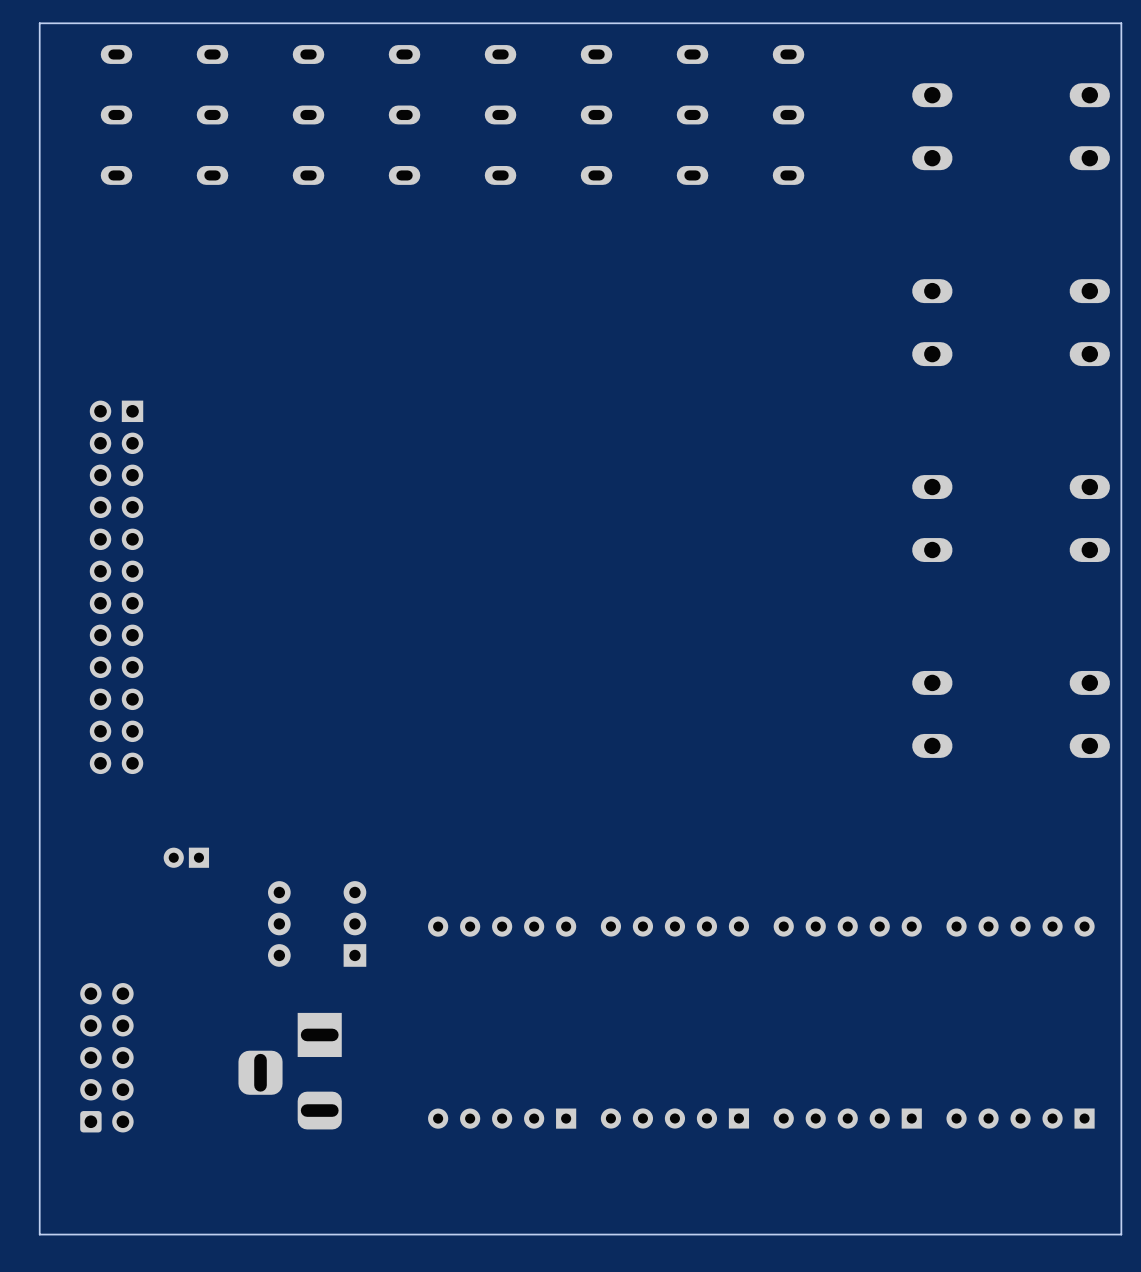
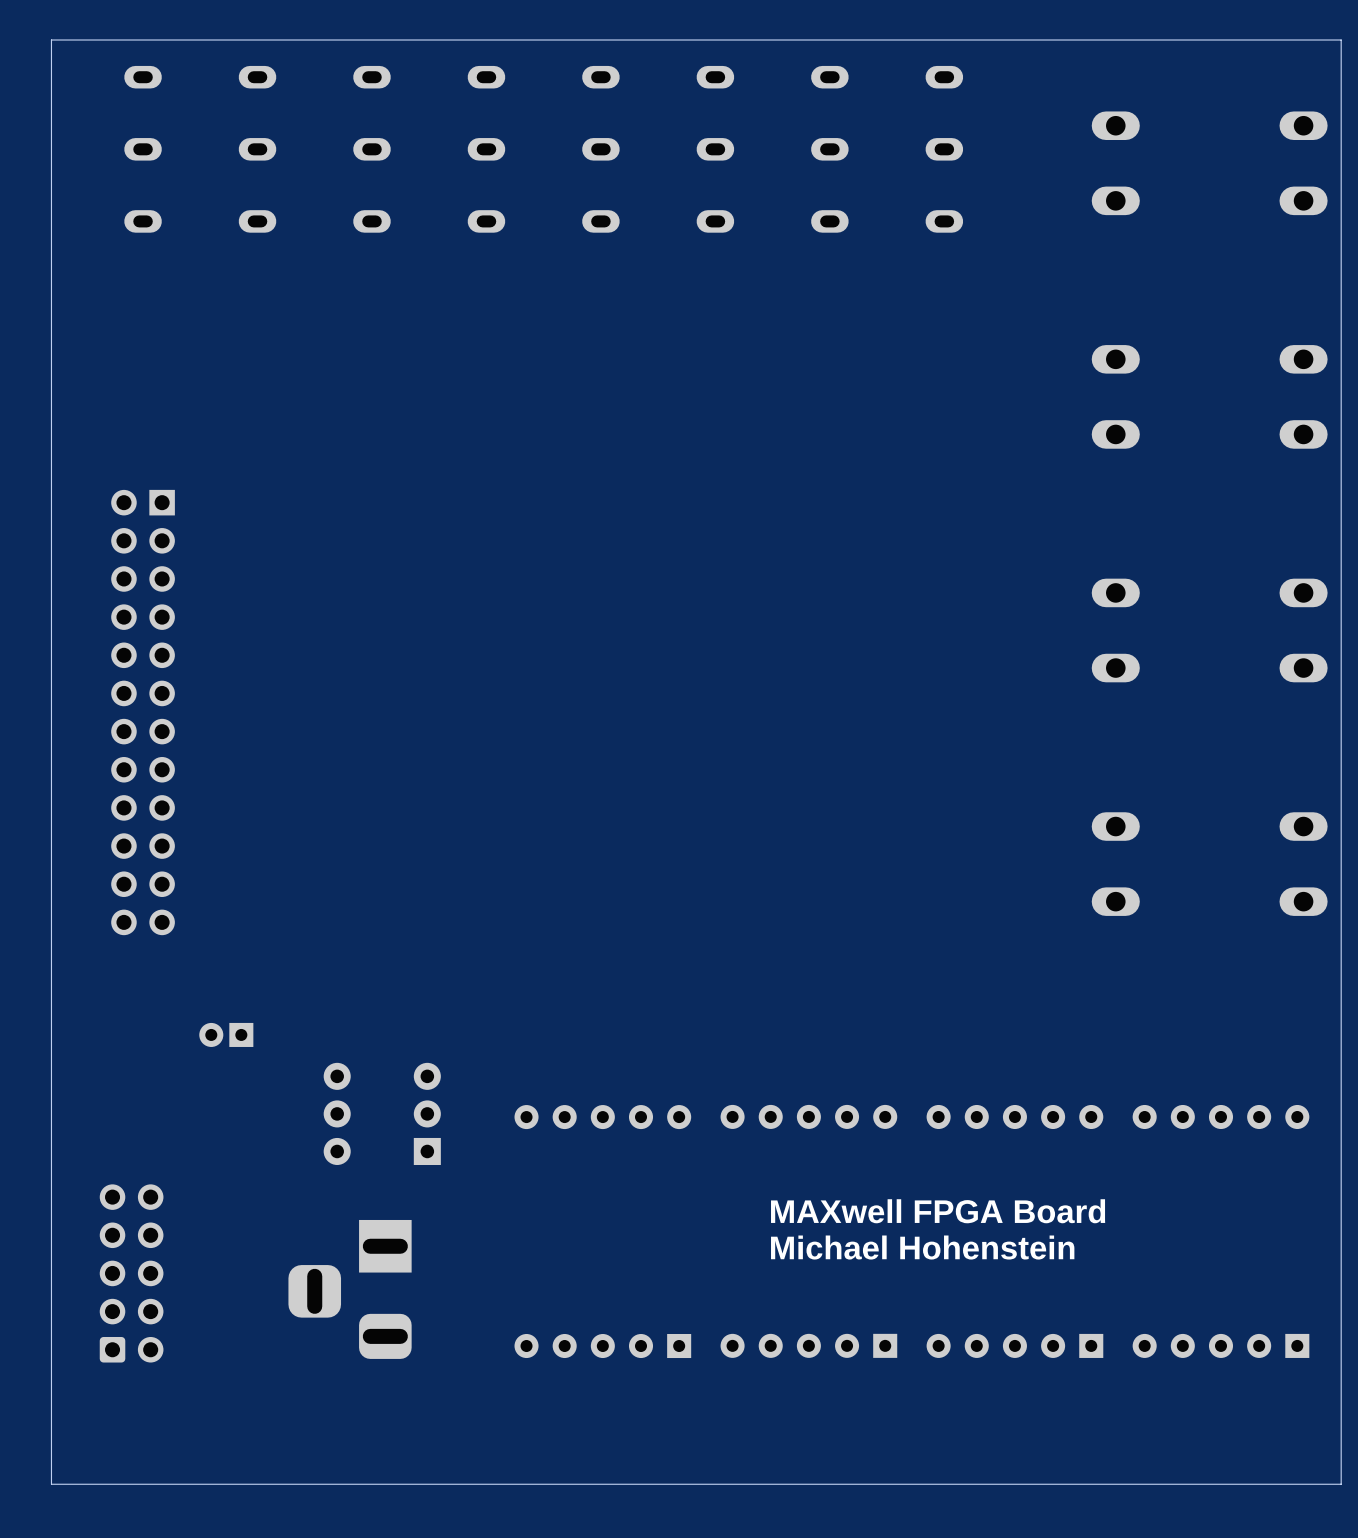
text: none -> MAXwell FPGA Board (938, 1211)
text: none -> Michael Hohenstein (922, 1247)

